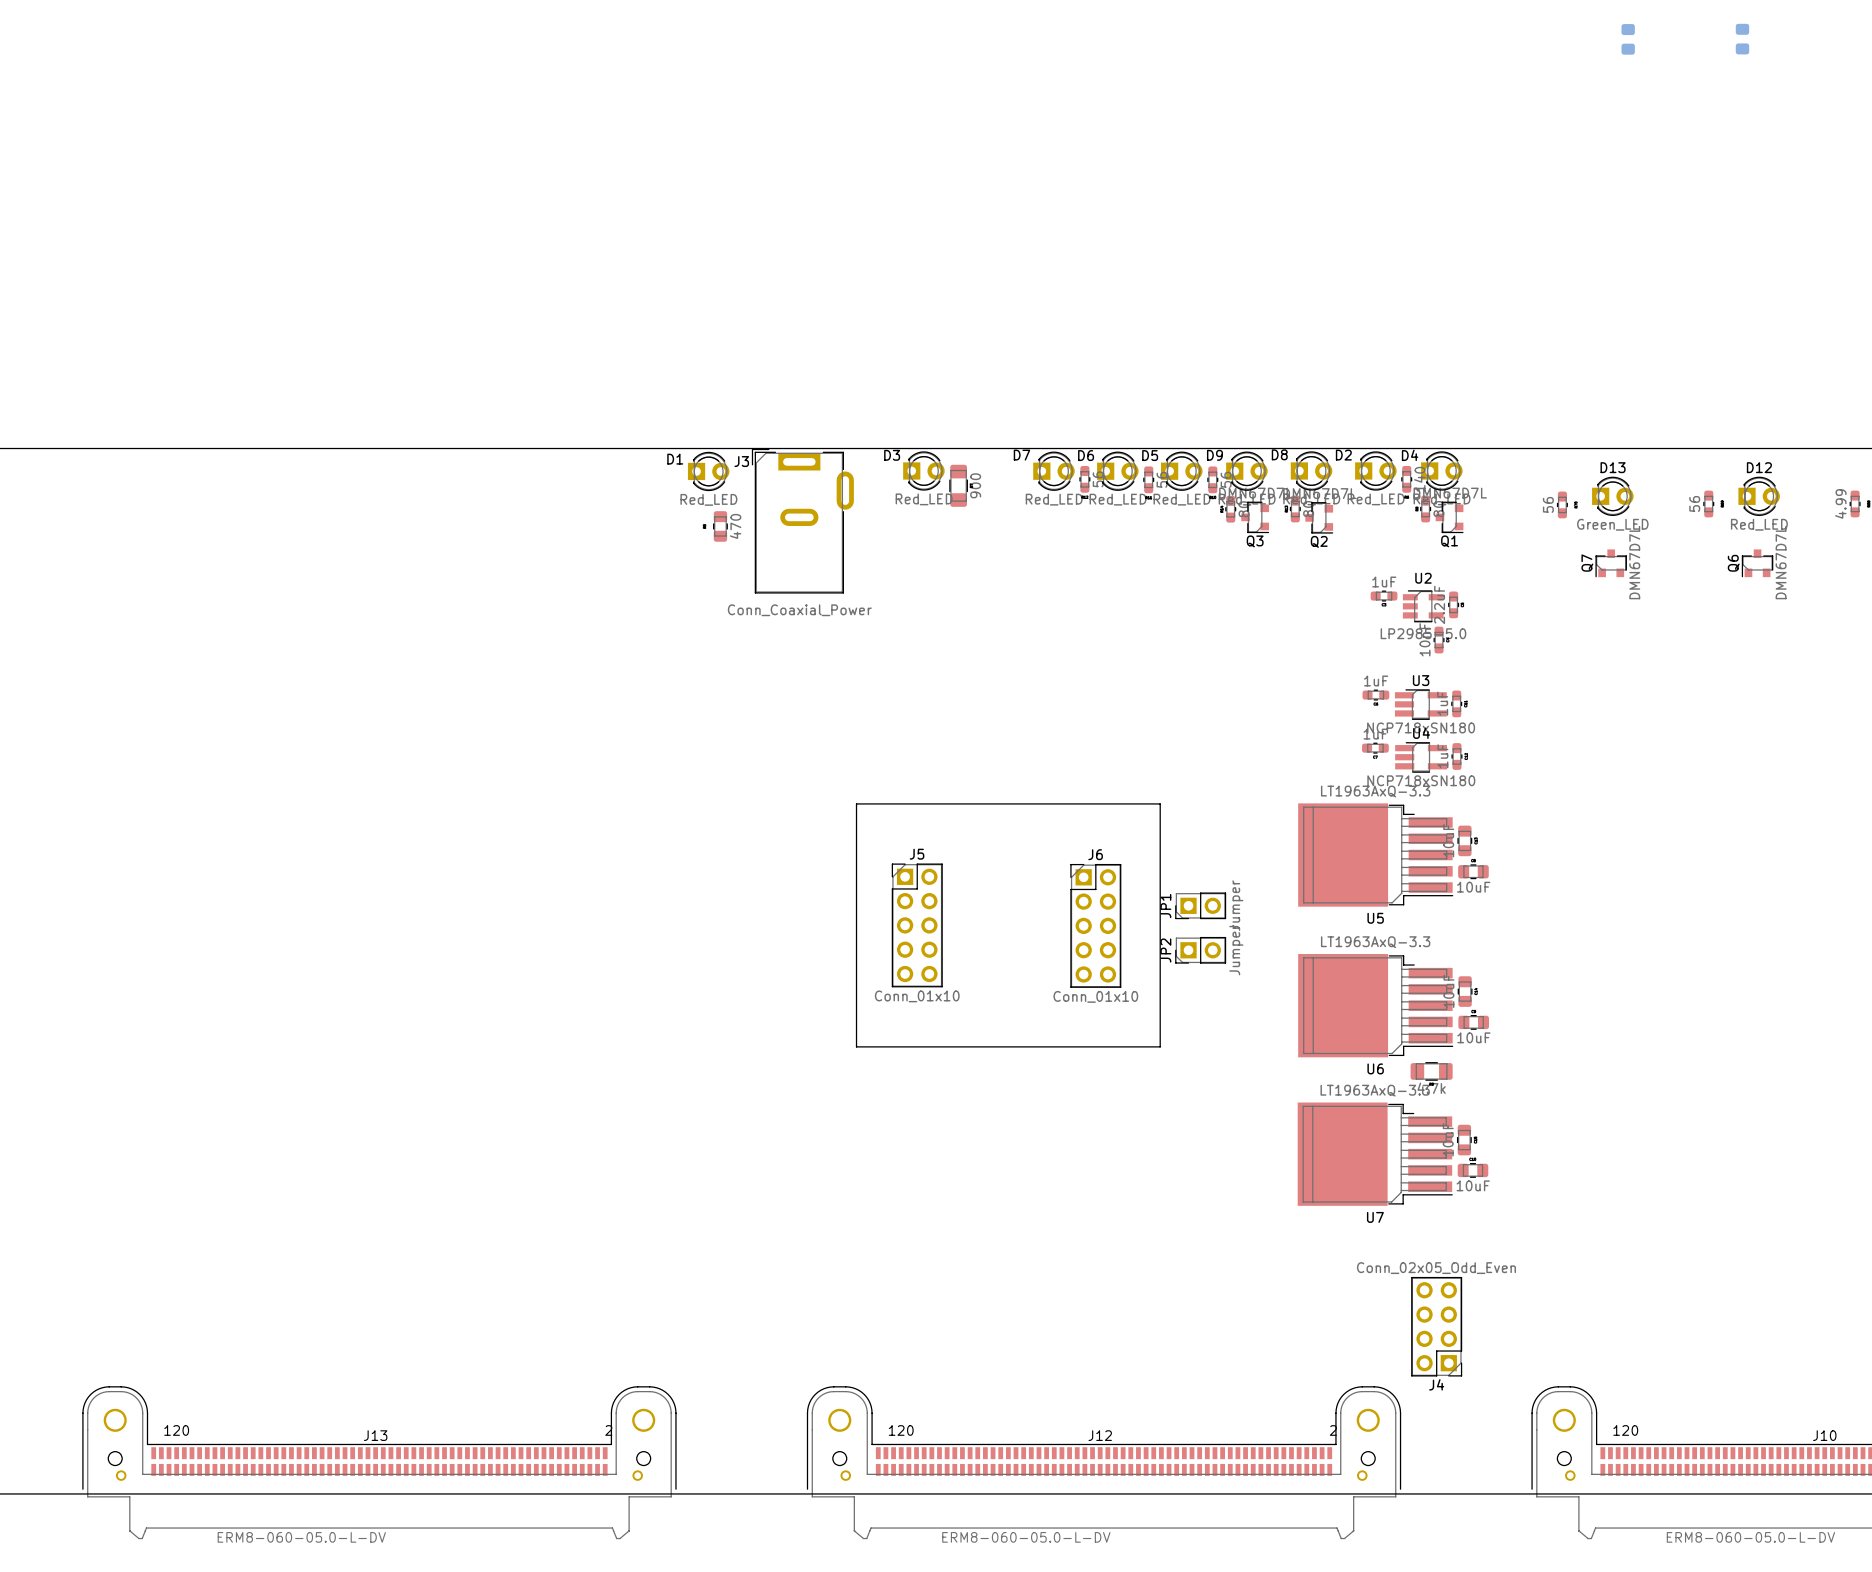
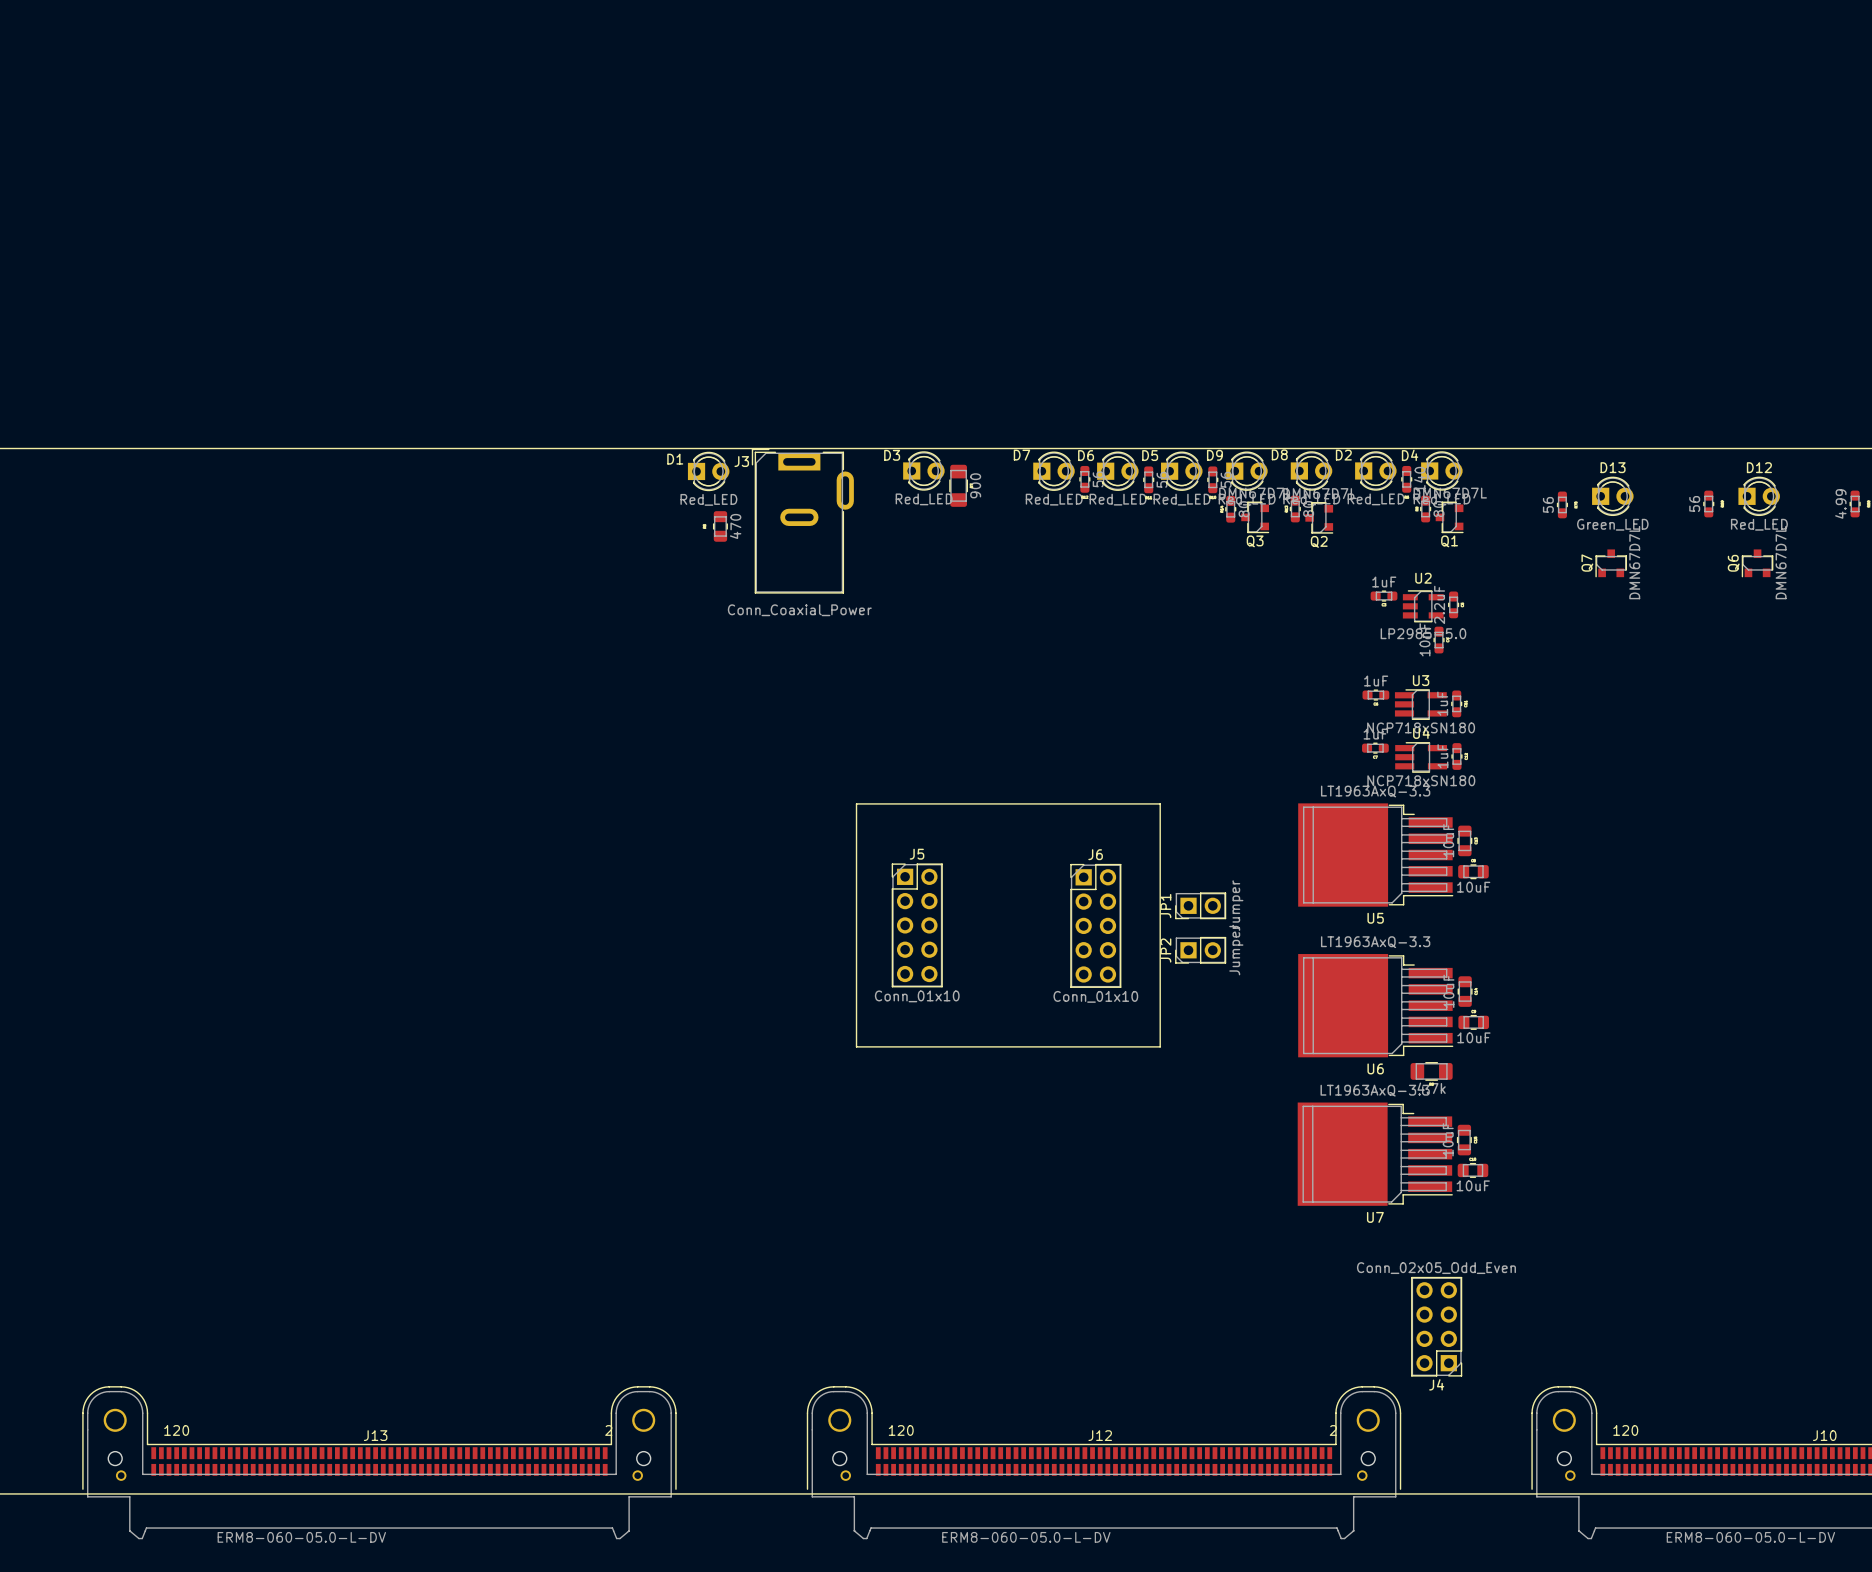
part: (1628, 39) -> none
part: (1742, 39) -> none

